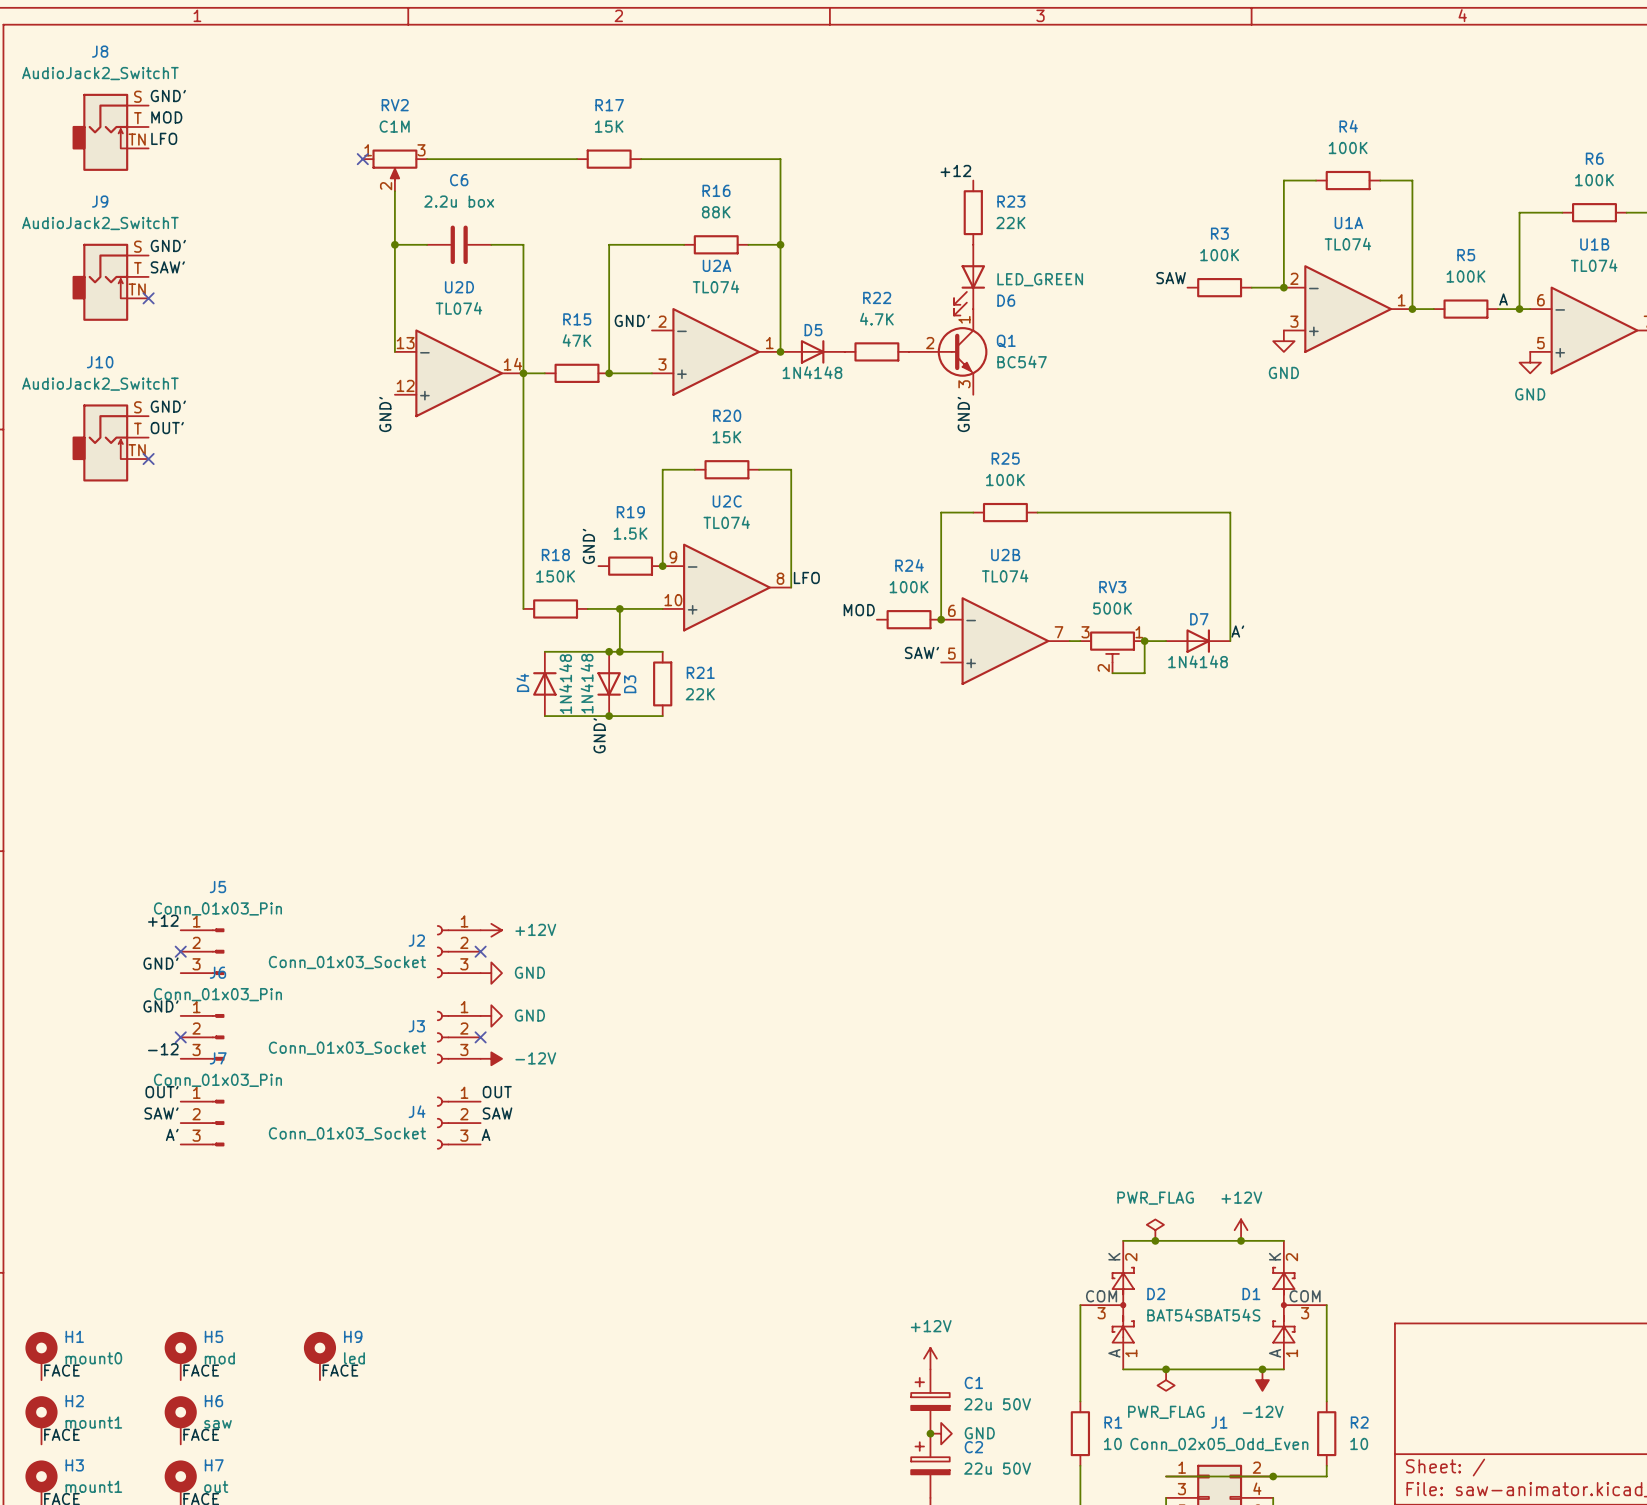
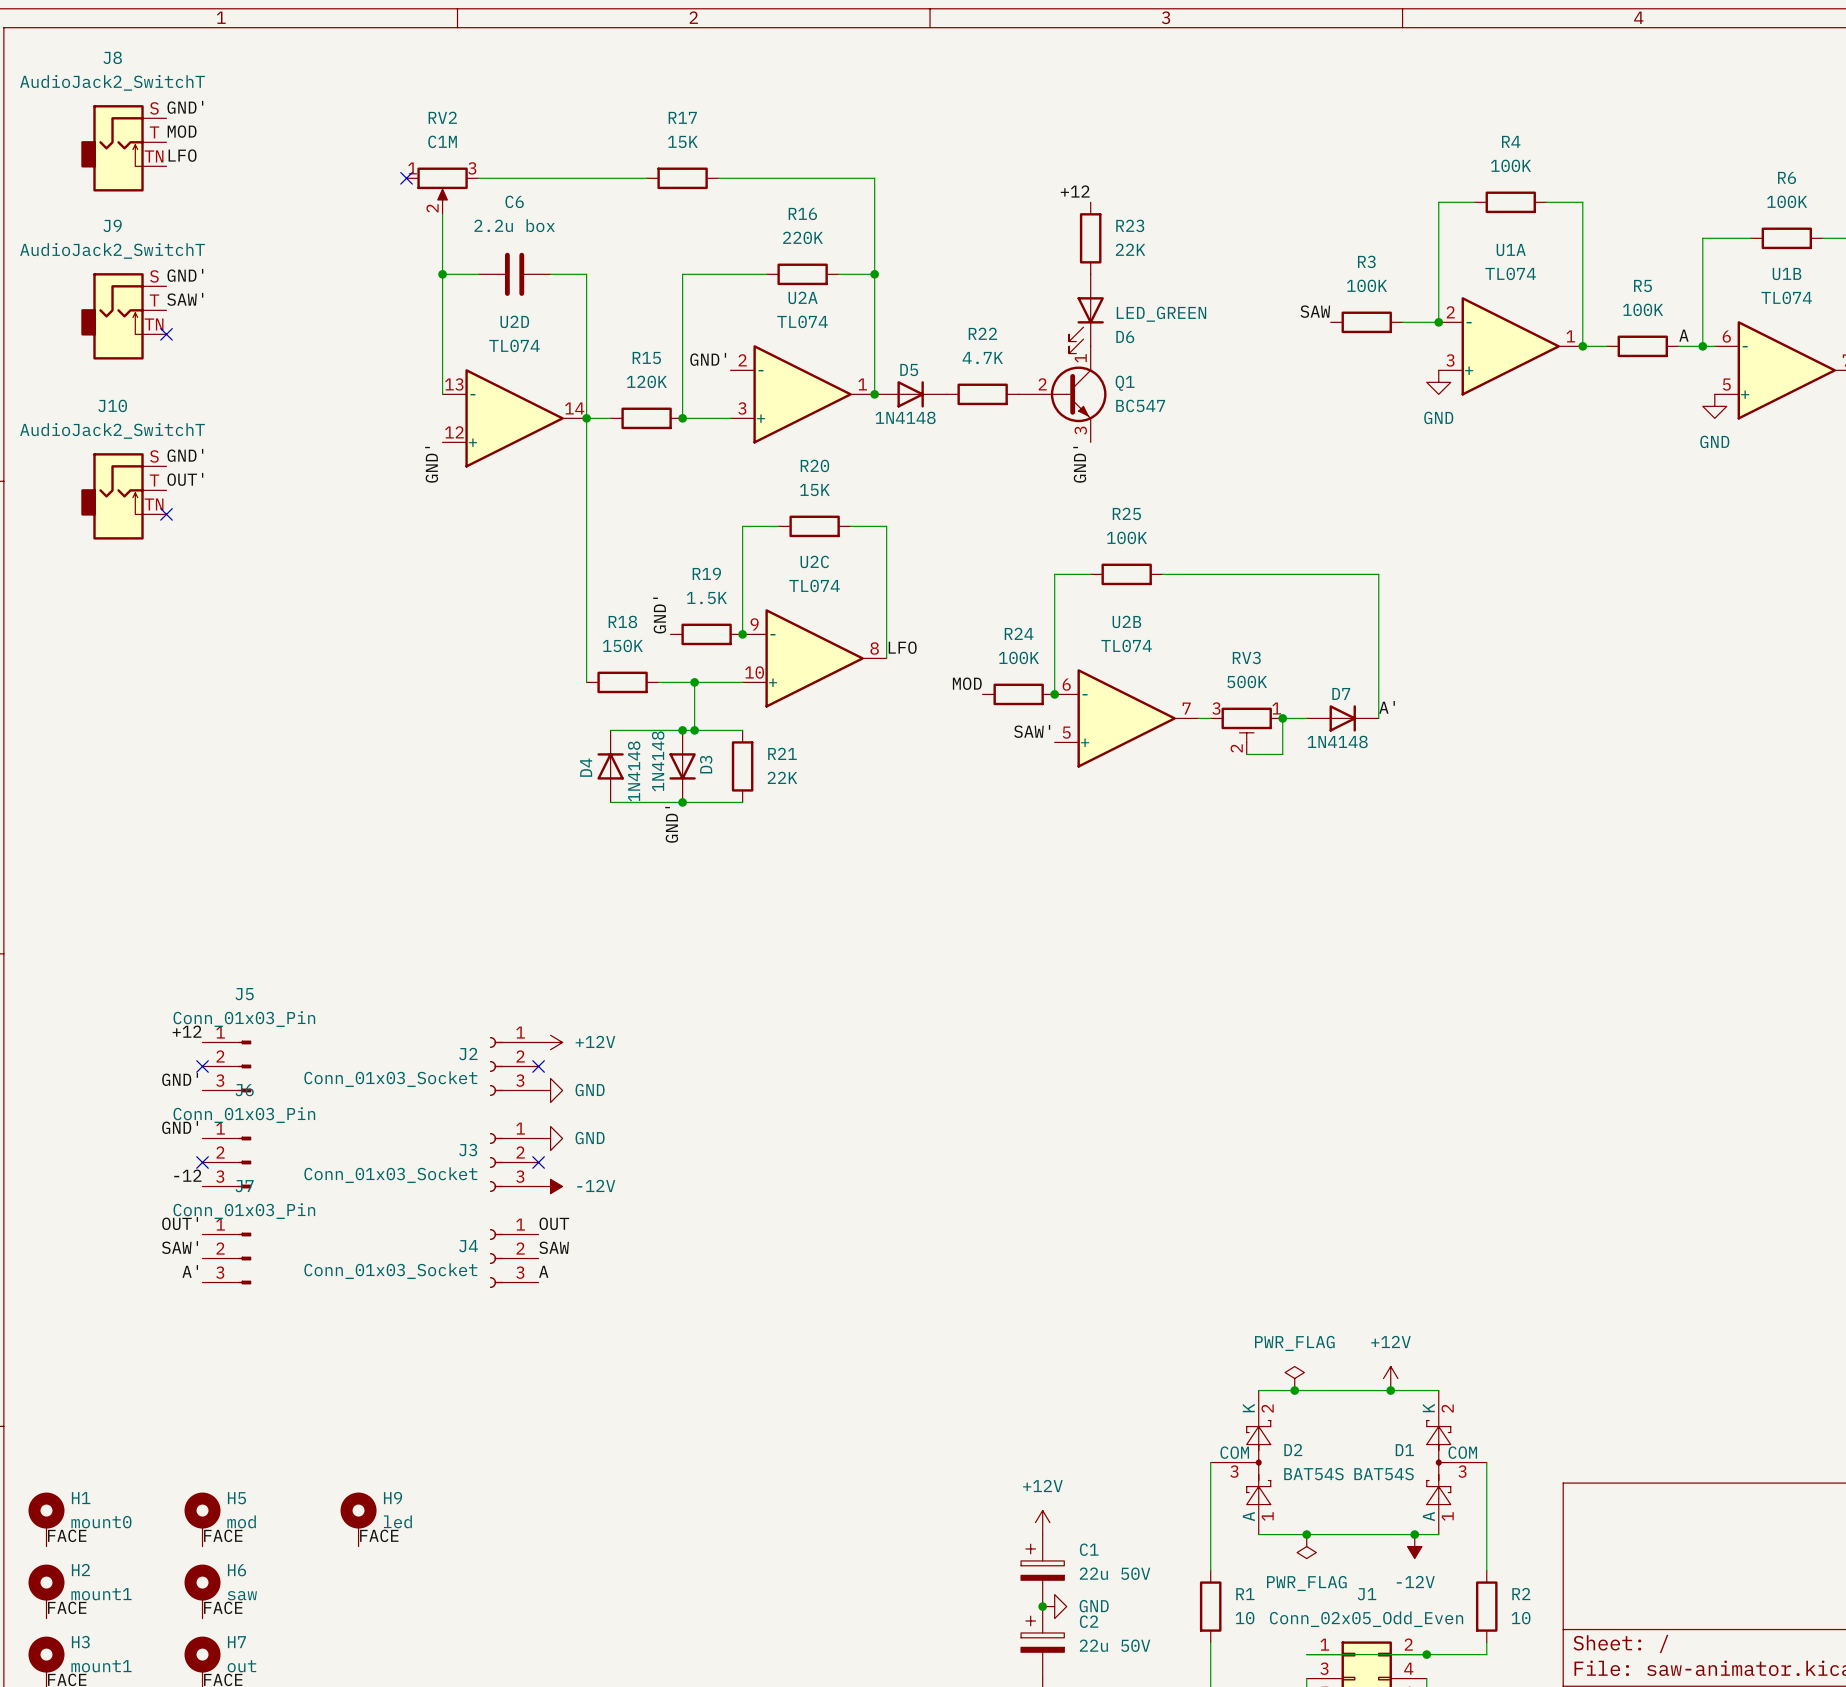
R16 value: 88K (716, 212) -> 220K (803, 237)
R15 value: 47K (577, 340) -> 120K (646, 381)

